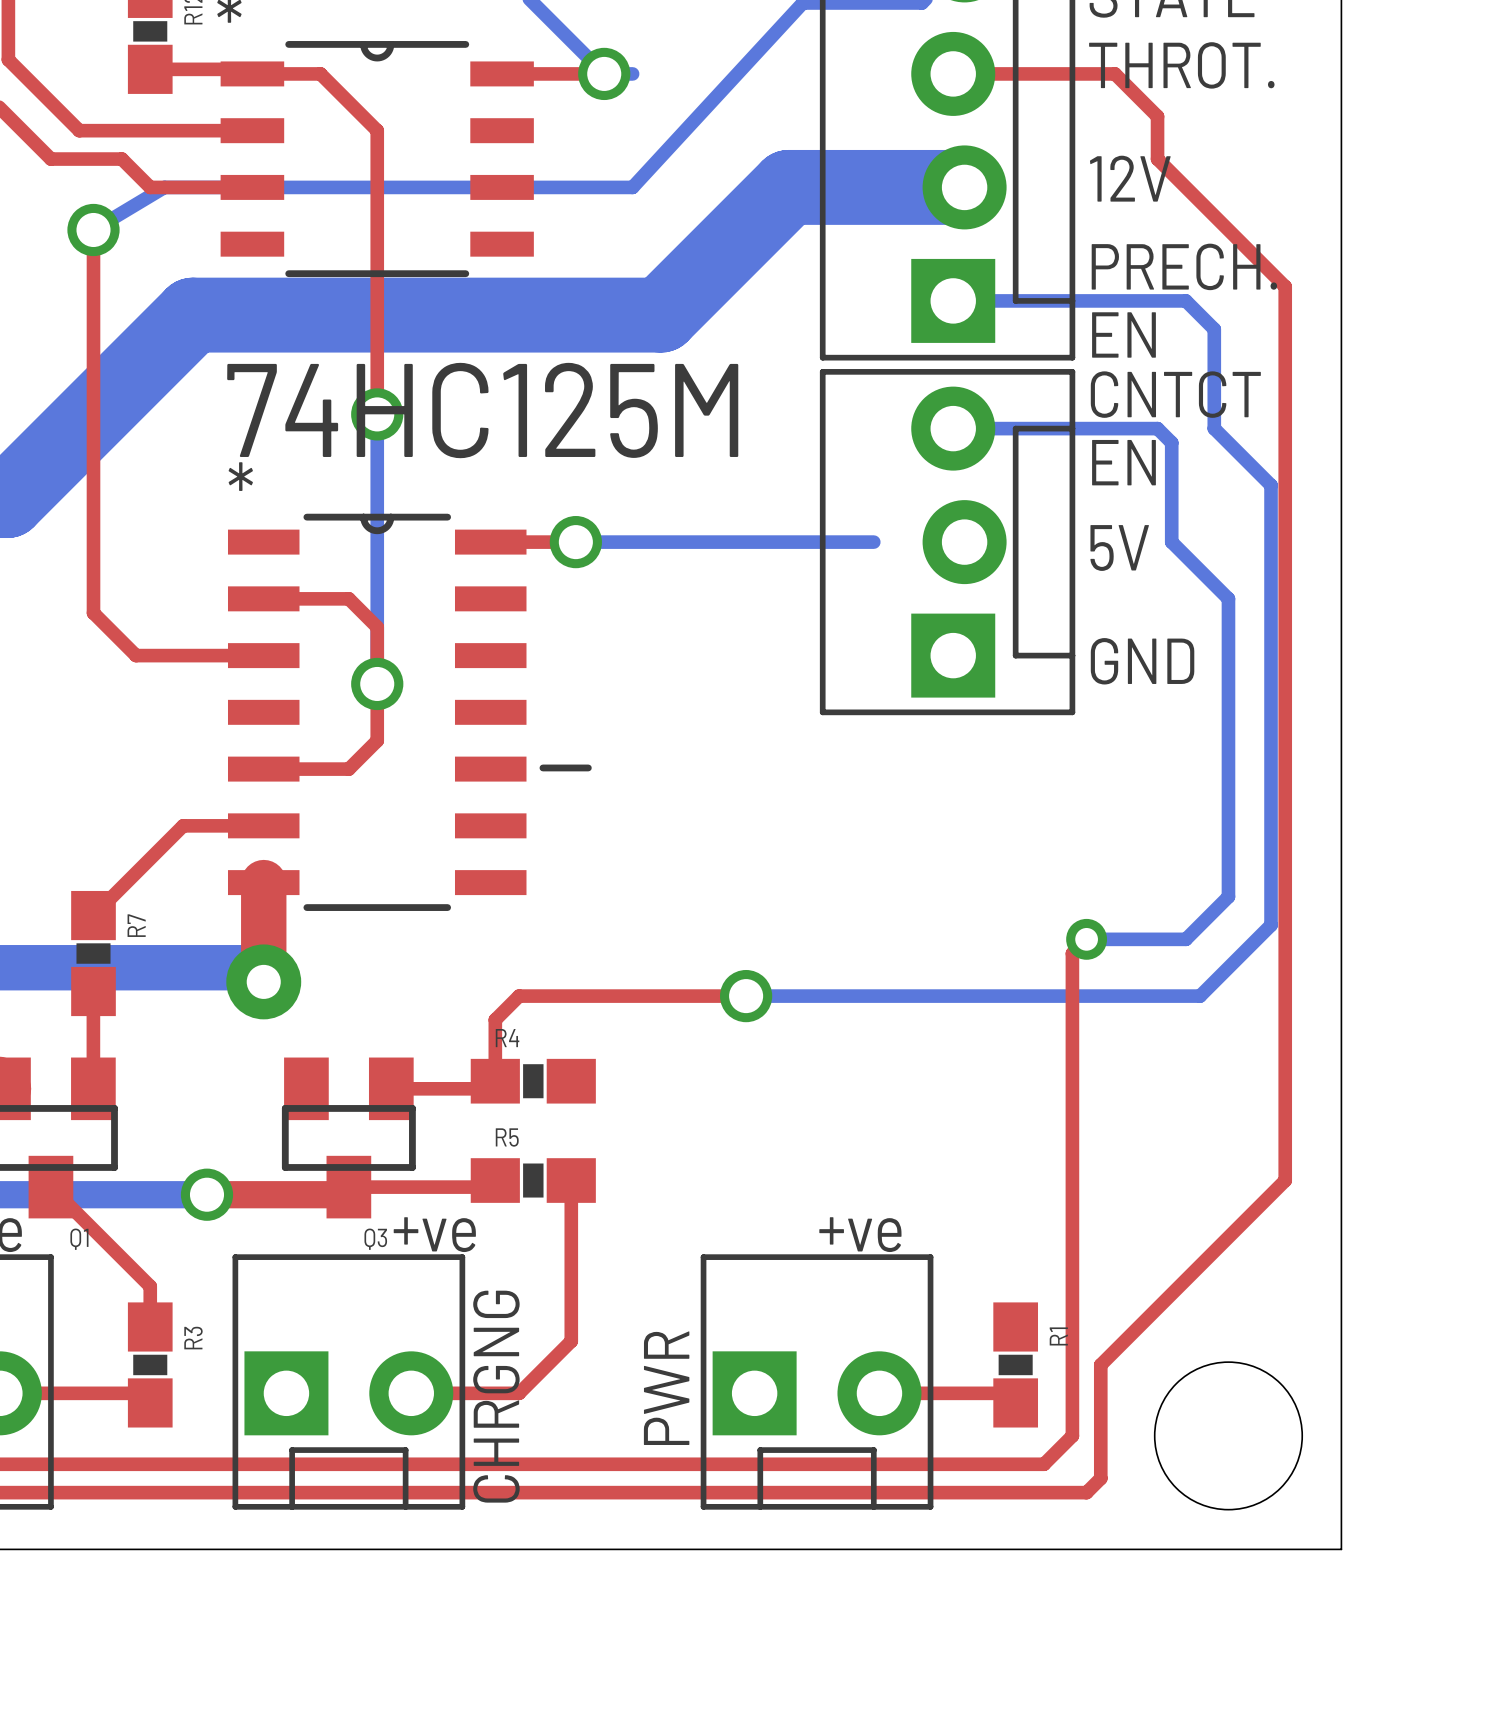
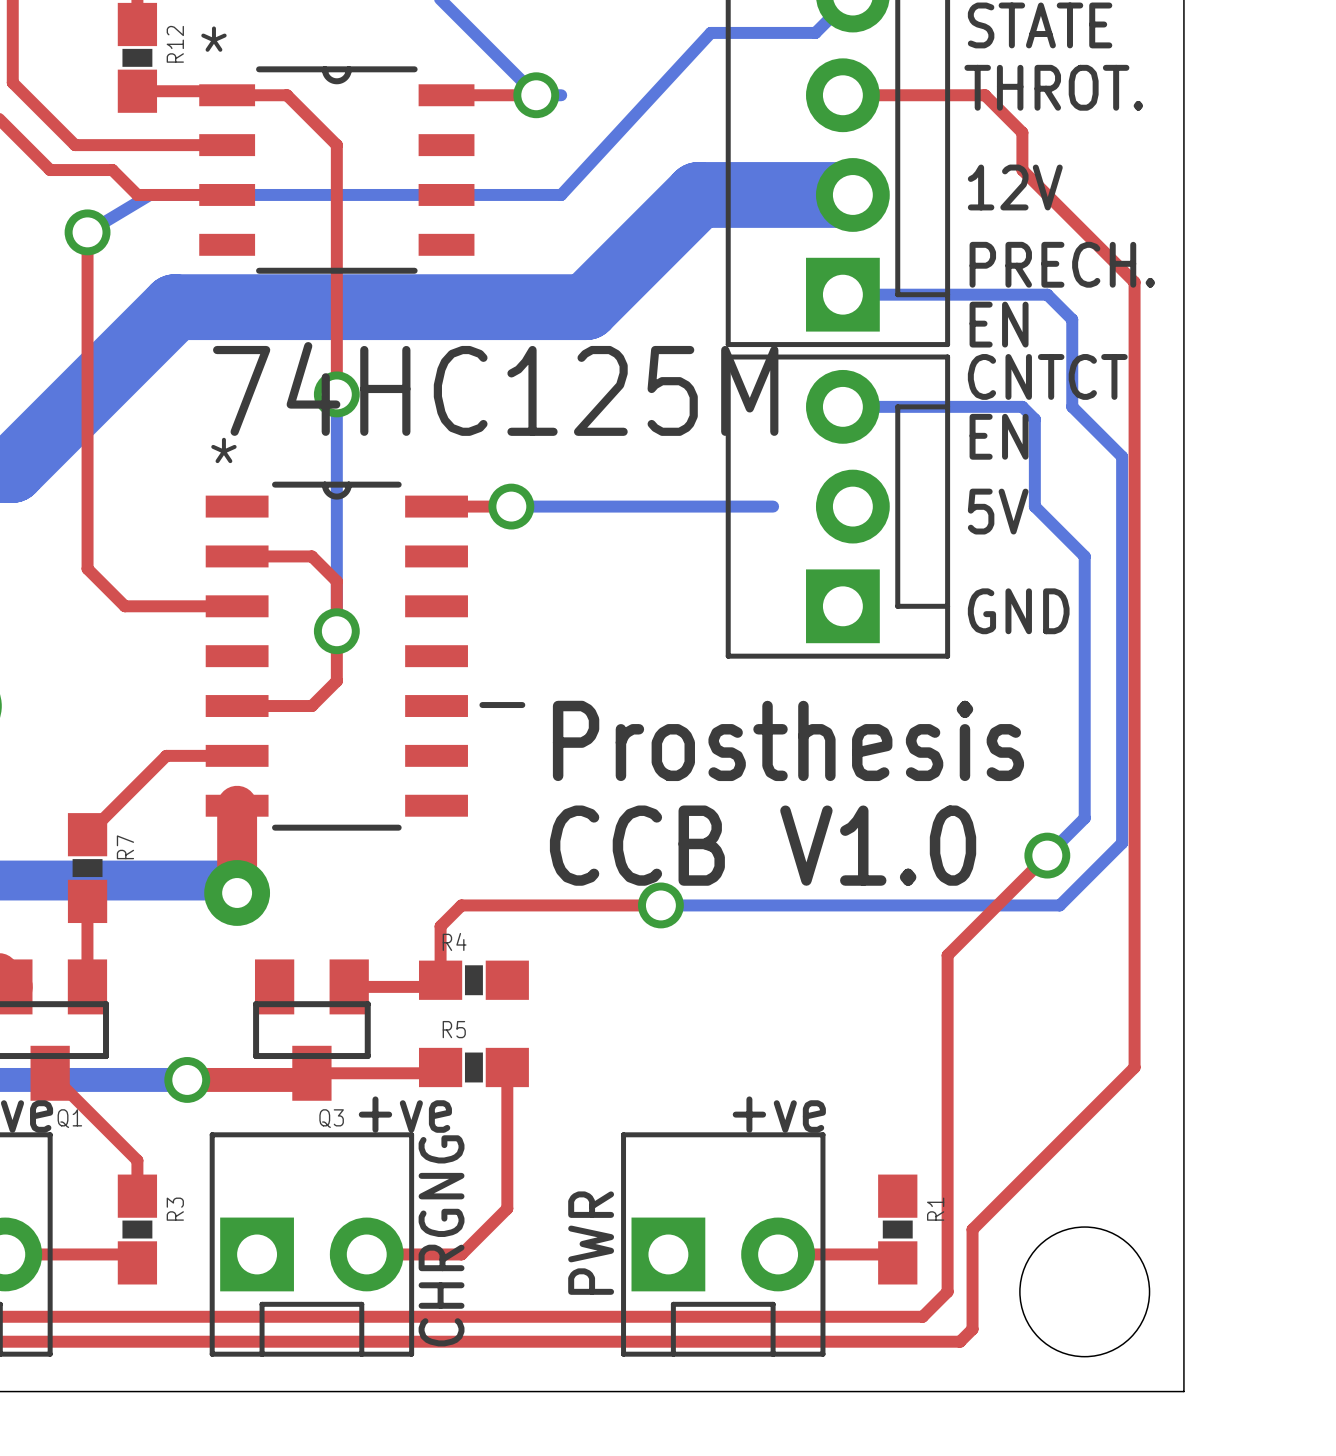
text: none -> Prosthesis (788, 740)
text: none -> CCB V1.0 (763, 845)
top track: (1086, 939) (1072, 953) (1072, 1052) -> (1047, 855) (947, 955)
bottom track: (1086, 939) (1185, 939) -> none
via: (1086, 939) -> none
via: none -> (1047, 855)

